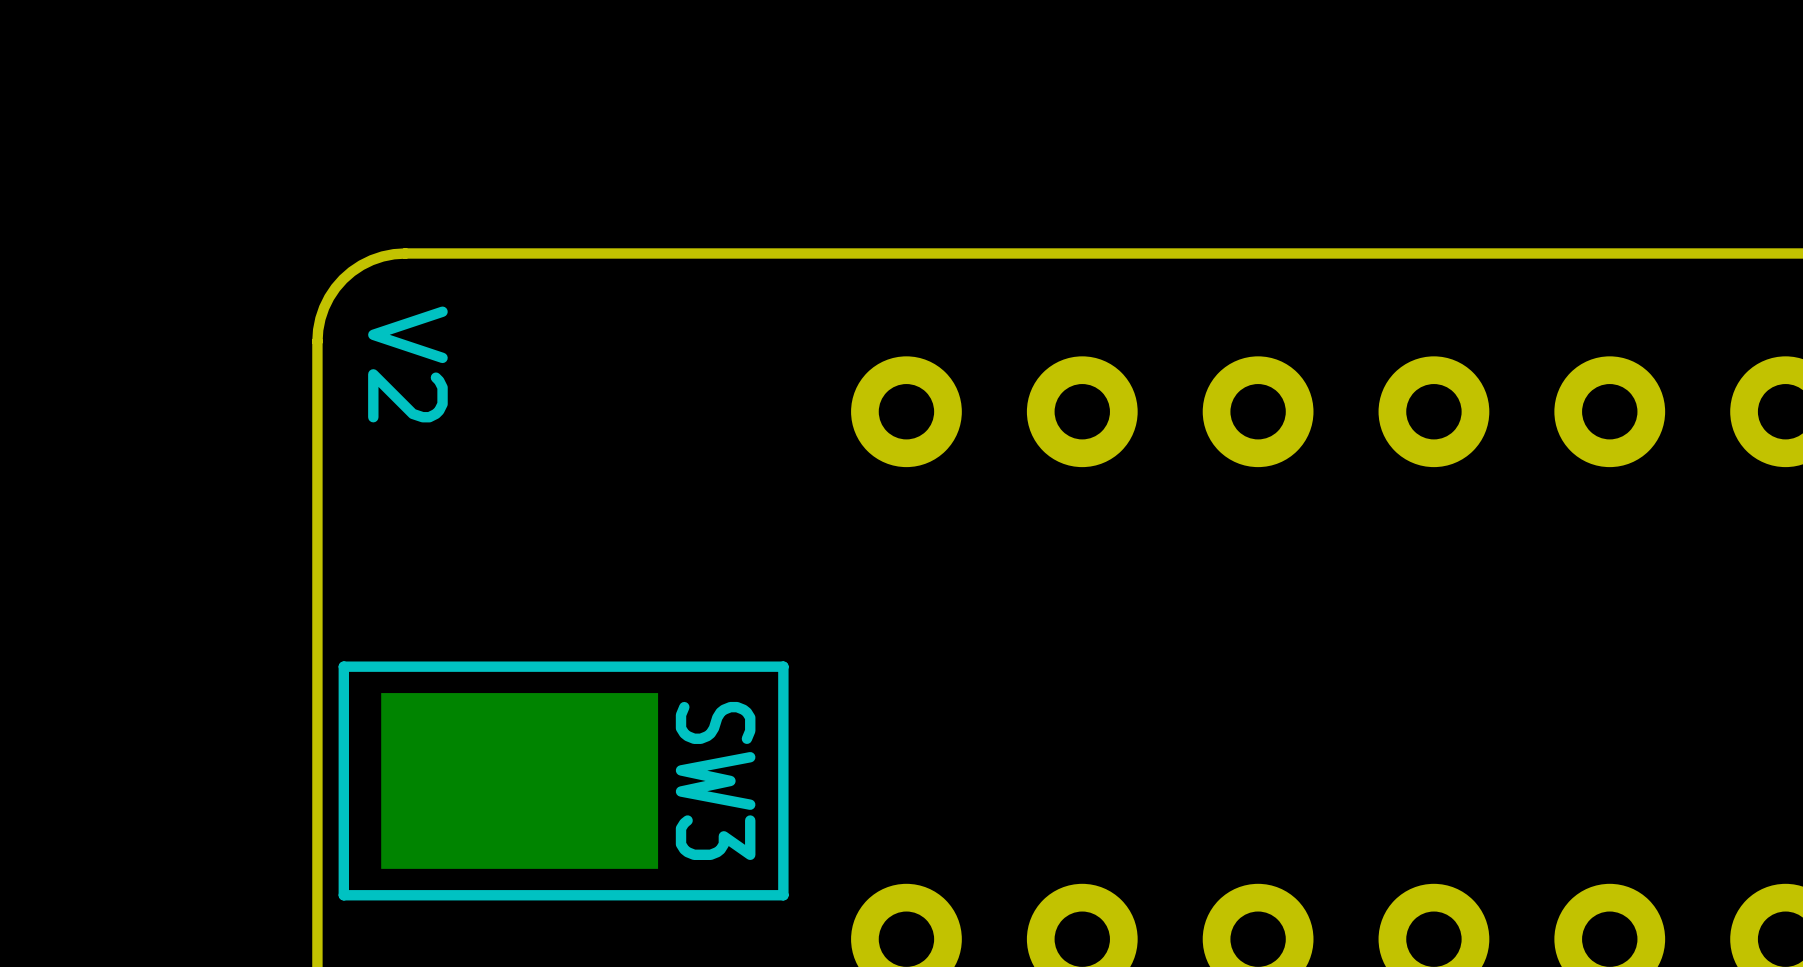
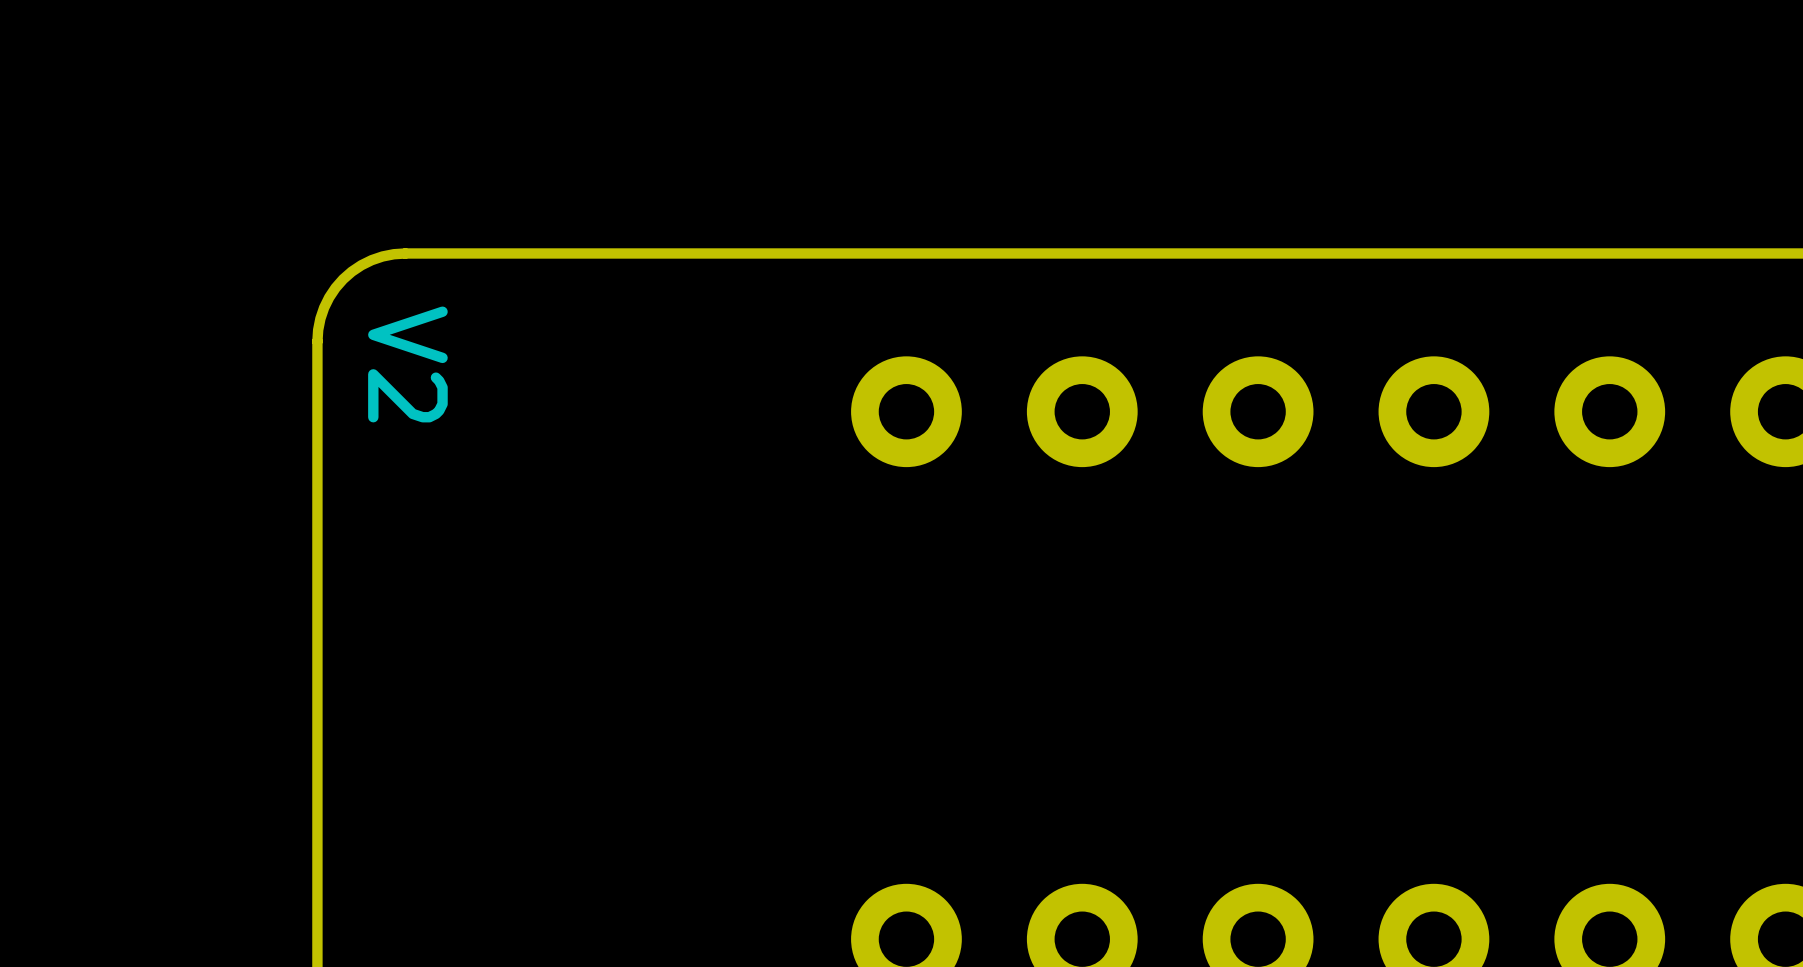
line: (783, 666) (783, 895) (343, 895) (343, 666) (783, 666) -> none
part: (519, 780) -> none
text: SW3 (715, 780) -> none

